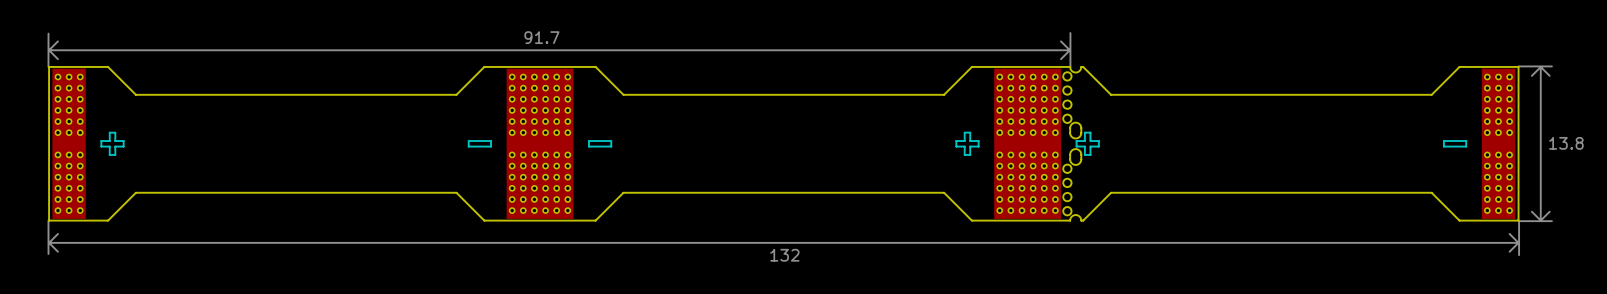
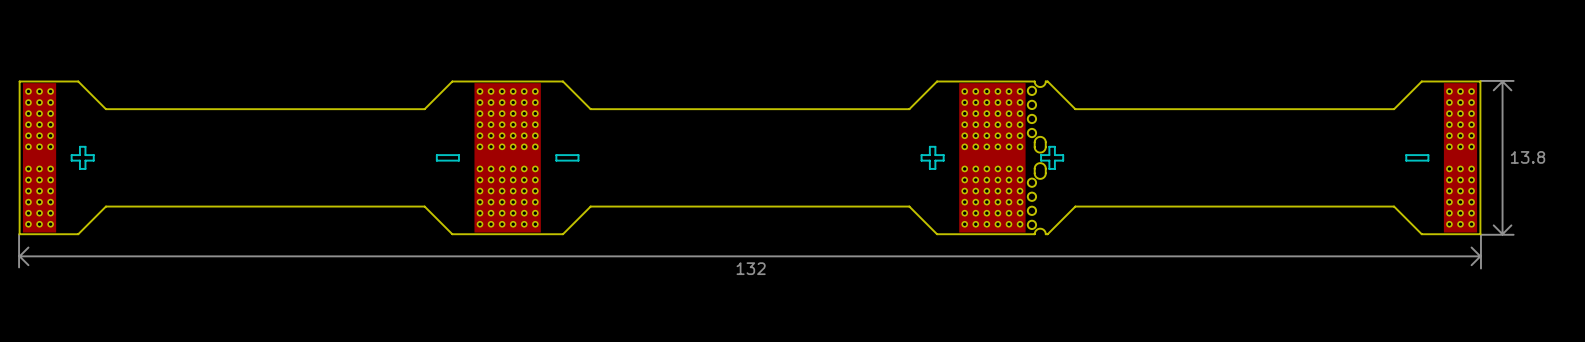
line: (48, 33) (48, 66) -> none
line: (1070, 33) (1070, 66) -> none
text: 91.7 (541, 37) -> none
line: (57, 41) (49, 50) -> none
line: (1060, 41) (1069, 50) -> none
line: (49, 50) (57, 59) -> none
line: (49, 50) (1069, 50) -> none
line: (1069, 50) (1060, 59) -> none

